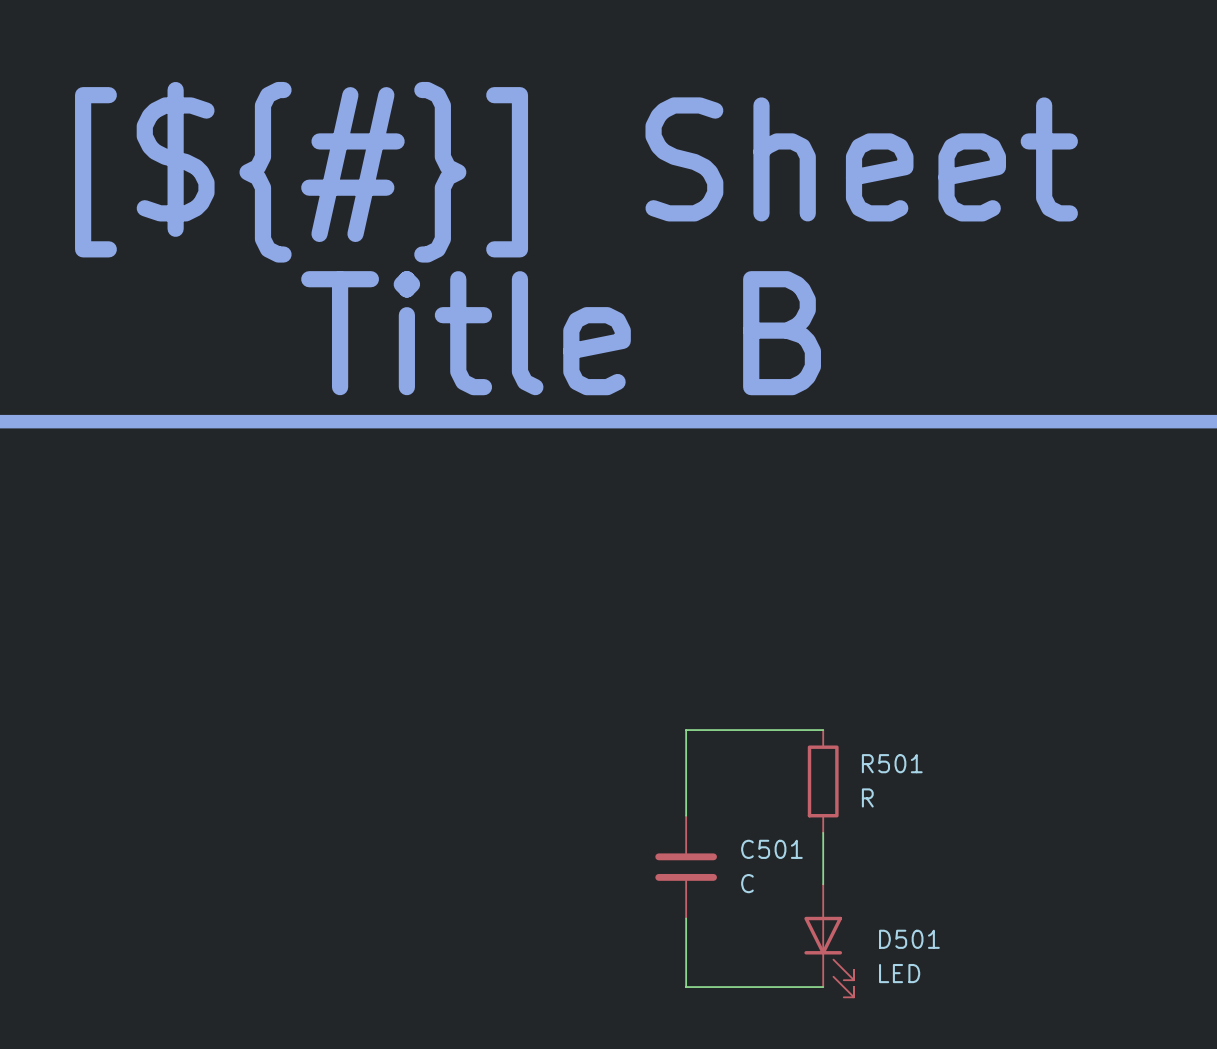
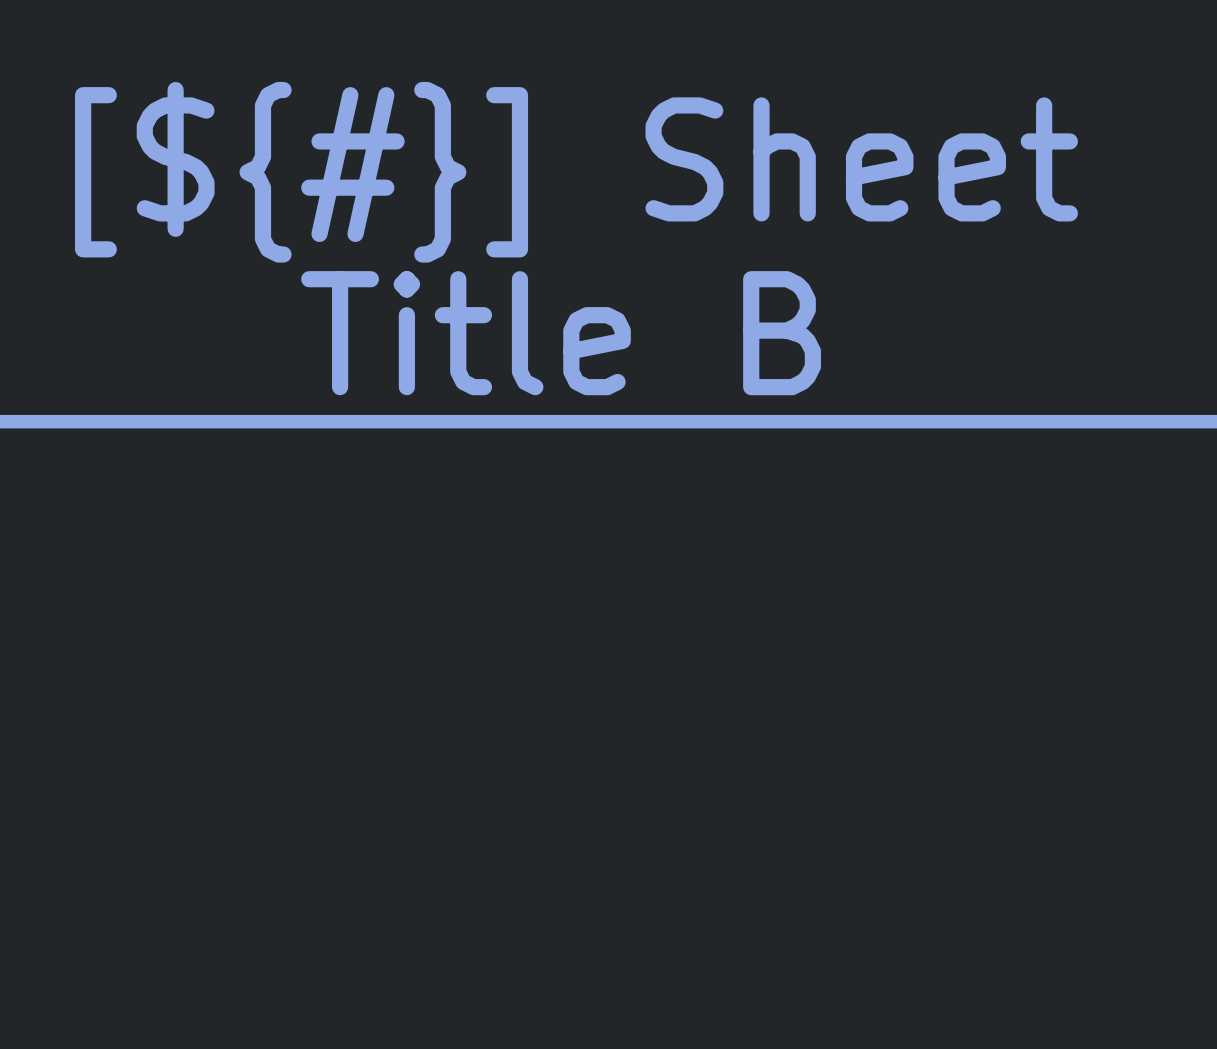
wire: (823, 730) (686, 730) (686, 815) -> none
R501: R (823, 781) -> none
wire: (823, 832) (823, 884) -> none
C501: C (686, 867) -> none
wire: (686, 918) (686, 987) (823, 987) -> none
D501: LED (829, 940) -> none

